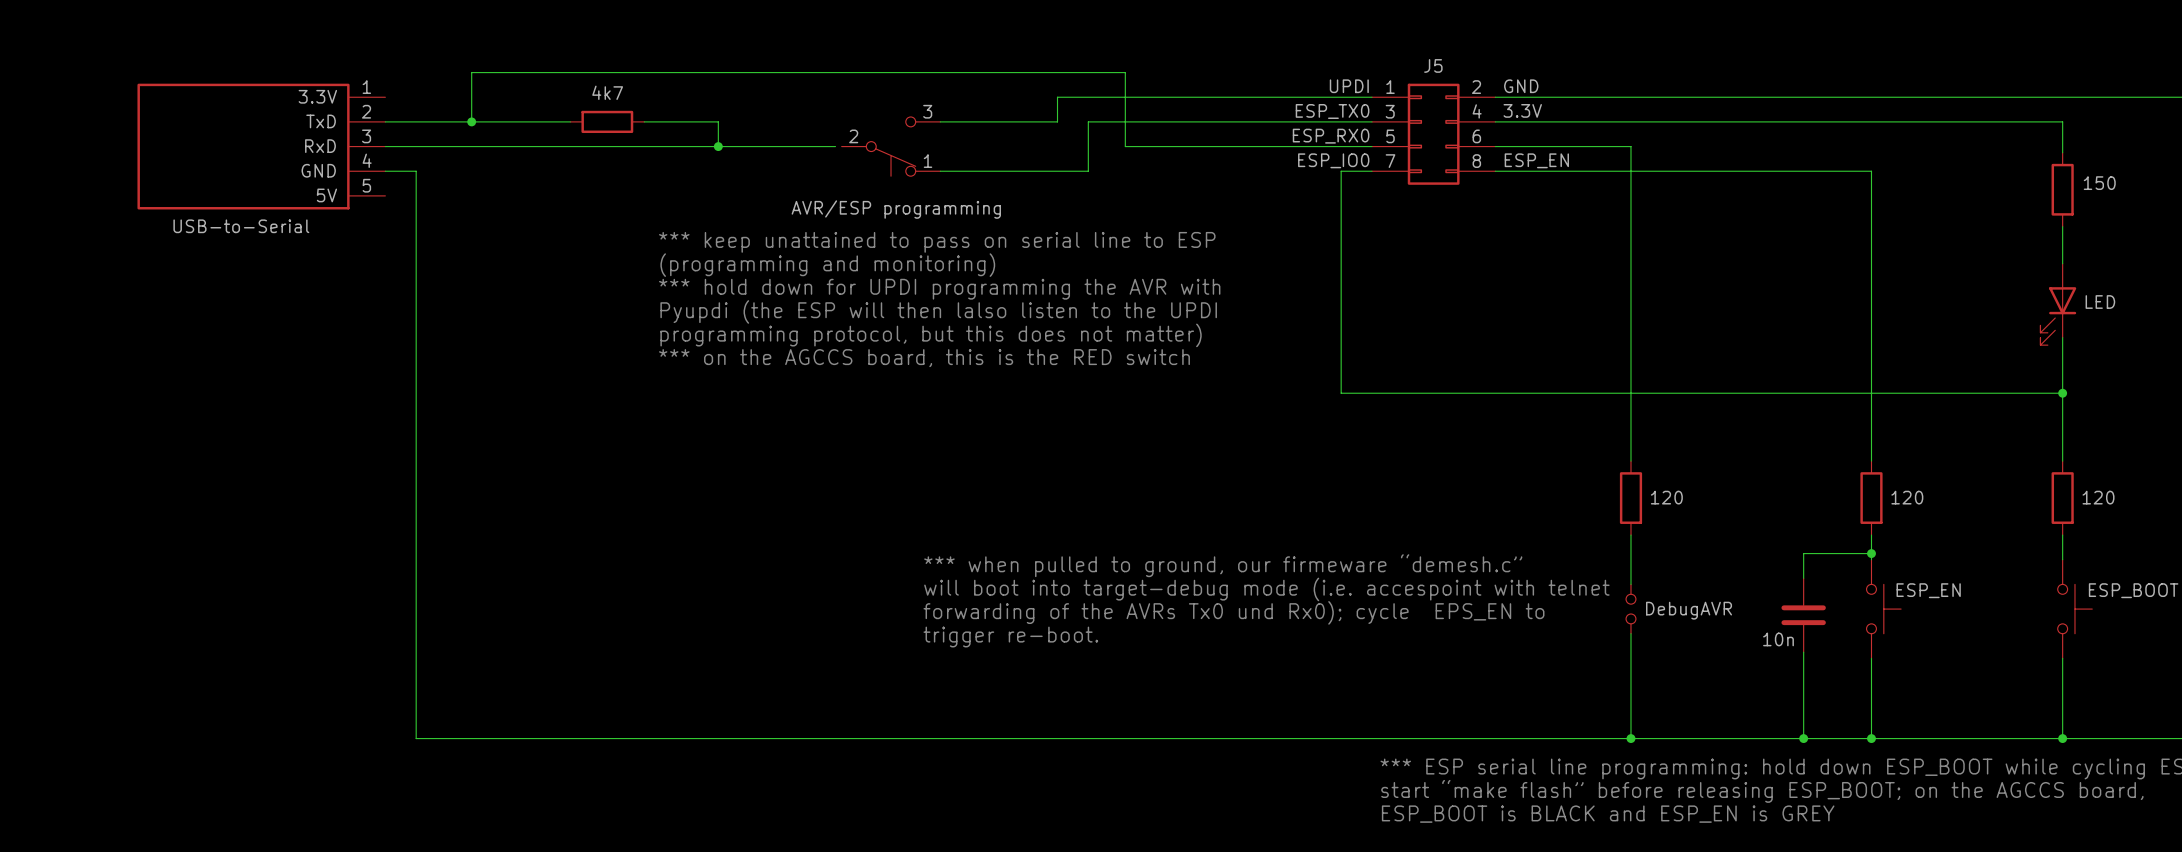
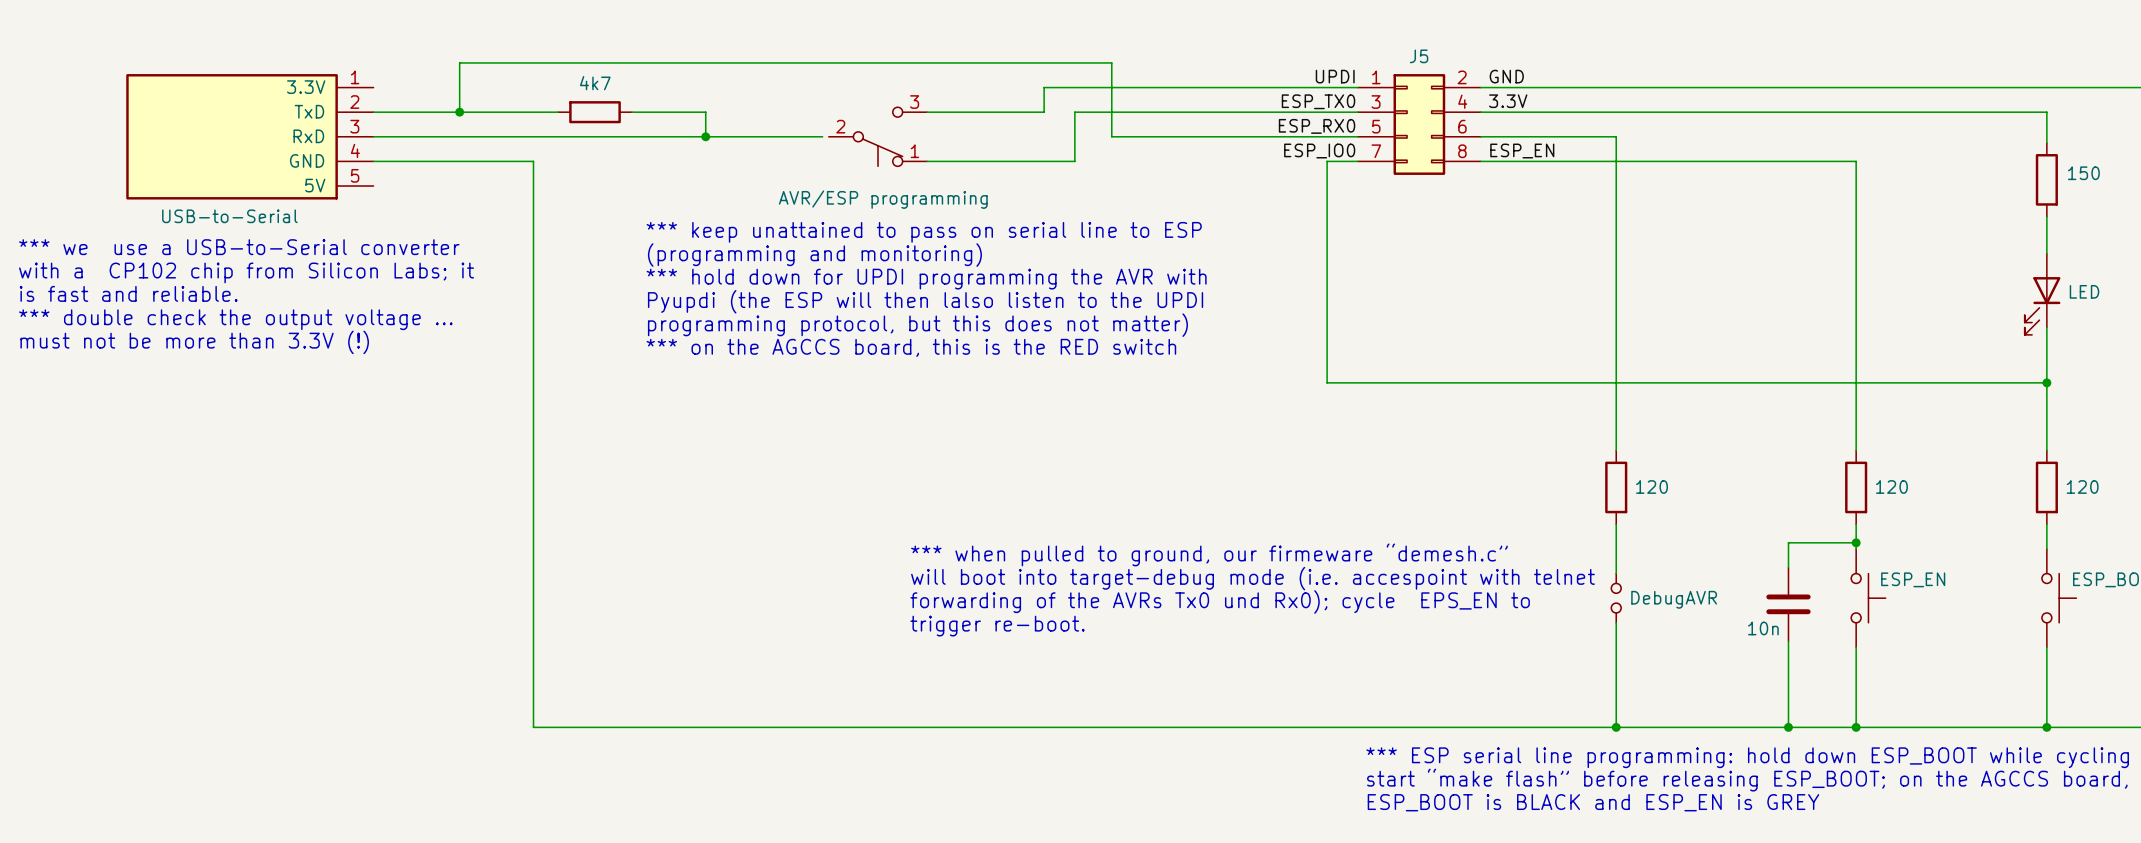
wire: (416, 171) (416, 738) (545, 738) -> (404, 161) (533, 161) (533, 727)
text: none -> *** we use a USB-to-Serial converter (239, 247)
text: none -> with a CP102 chip from Silicon Labs; it (246, 272)
text: none -> is fast and reliable. (128, 293)
text: none -> *** double check the output voltage … (235, 319)
text: none -> must not be more than 3.3V (!) (194, 342)

